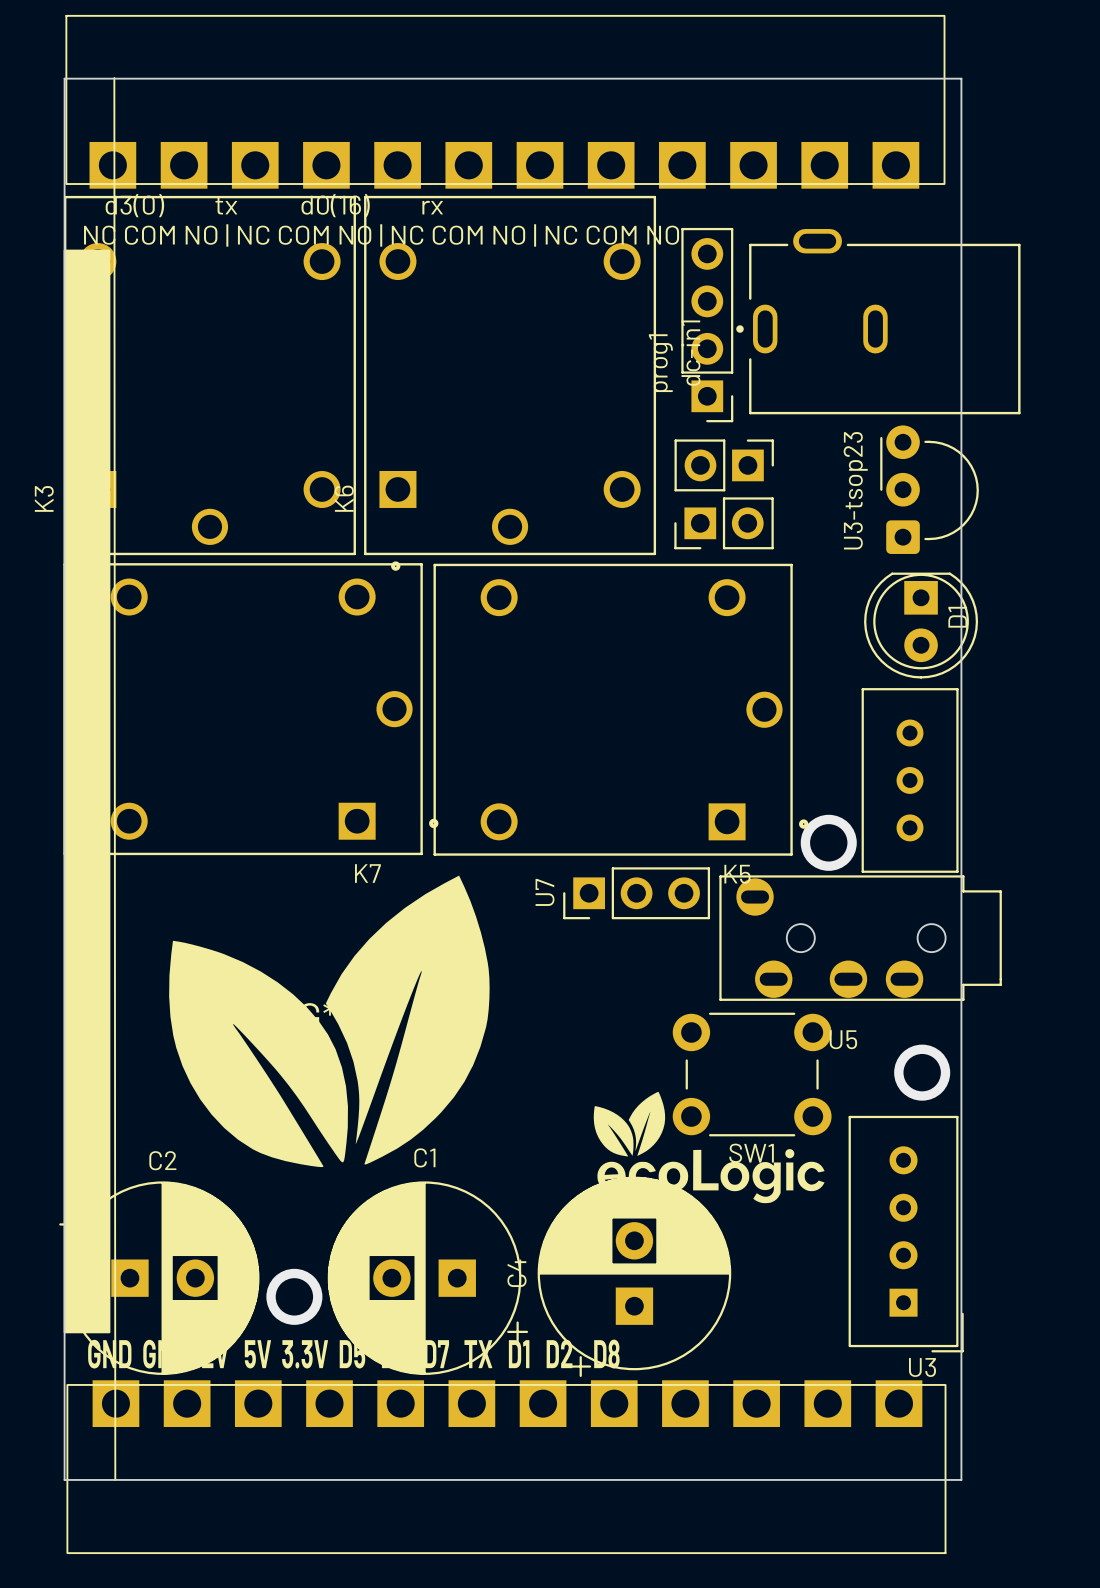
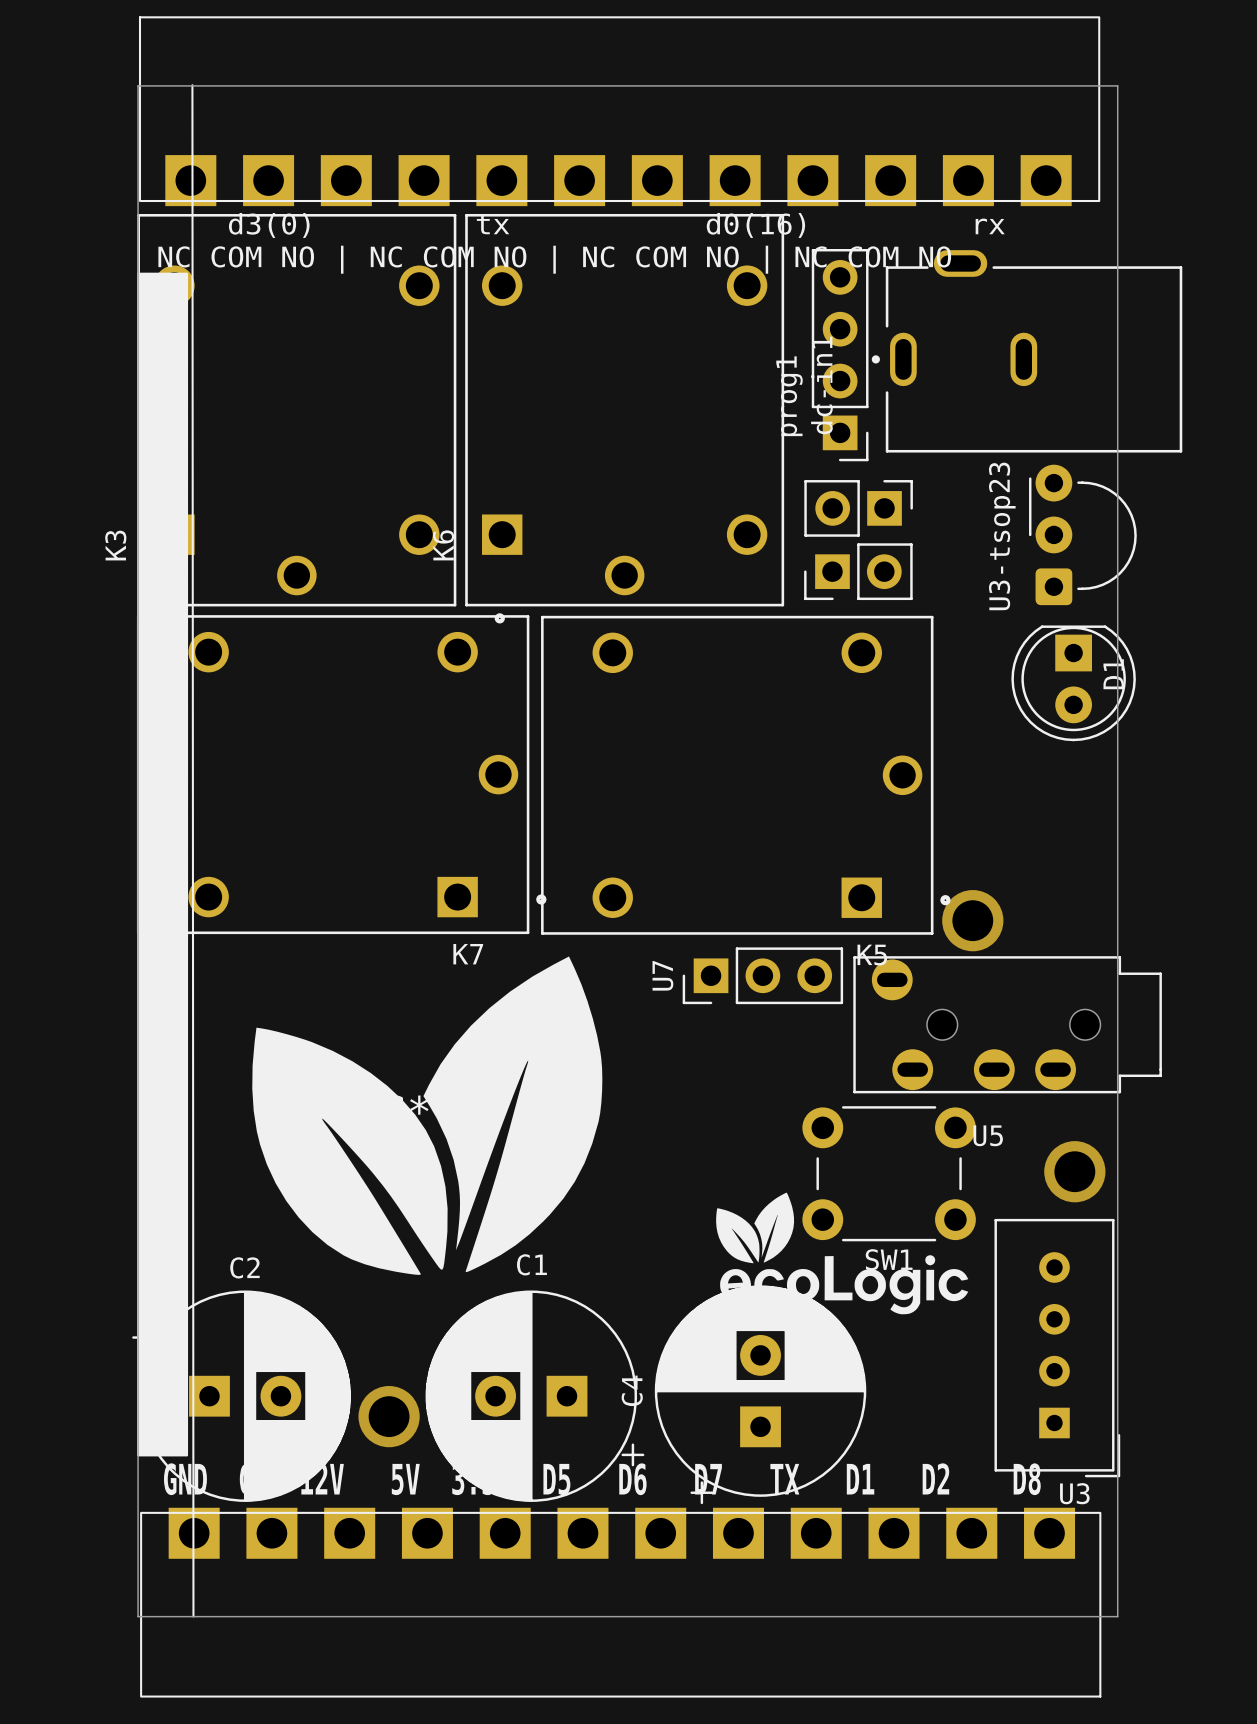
part: (910, 780) -> none

